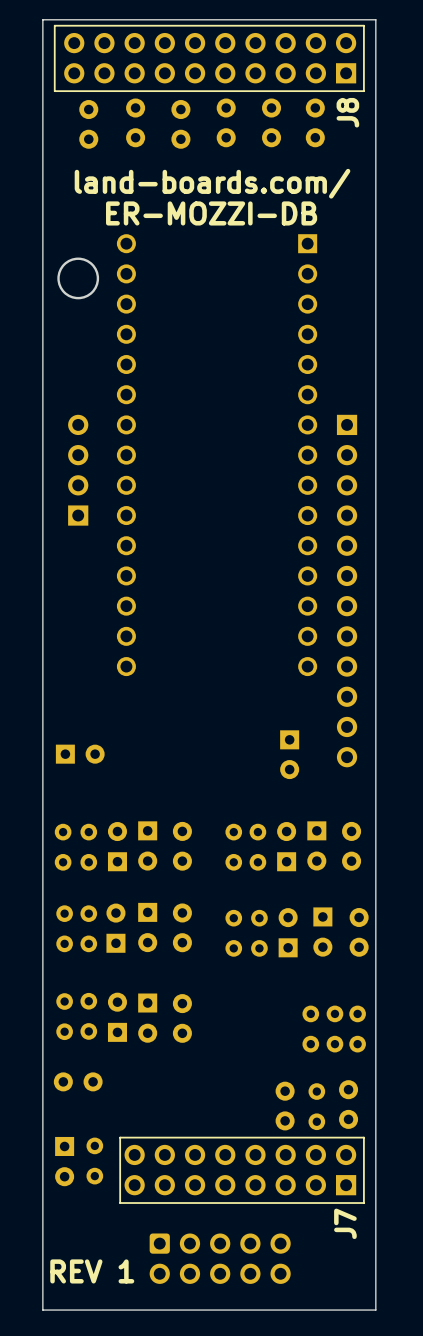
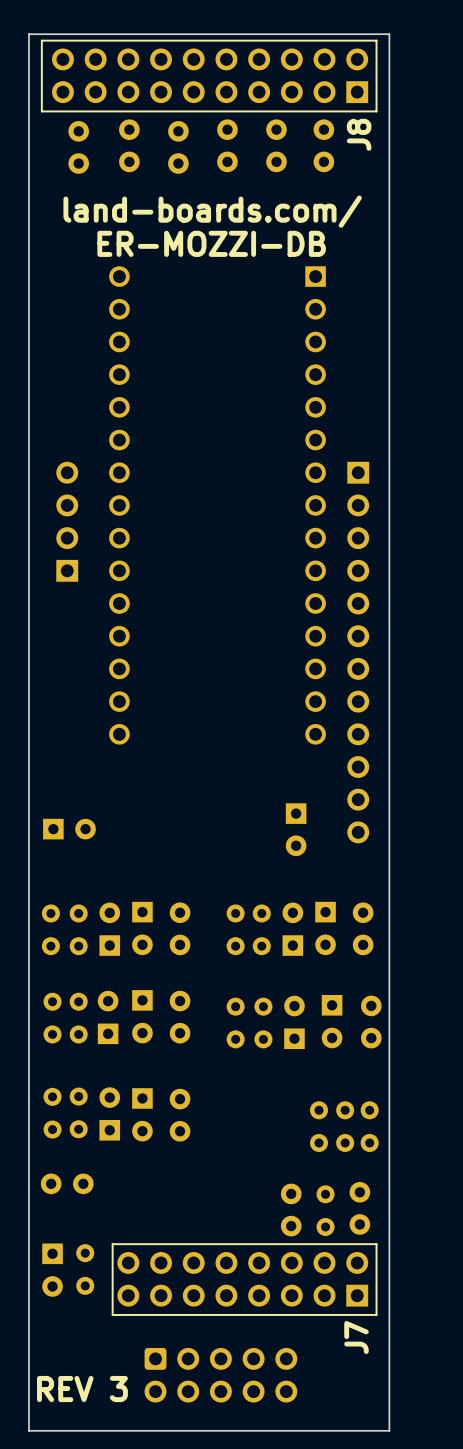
round board edge: [57, 257, 100, 300] -> none
text: REV 1 (92, 1271) -> REV 3 (82, 1389)

